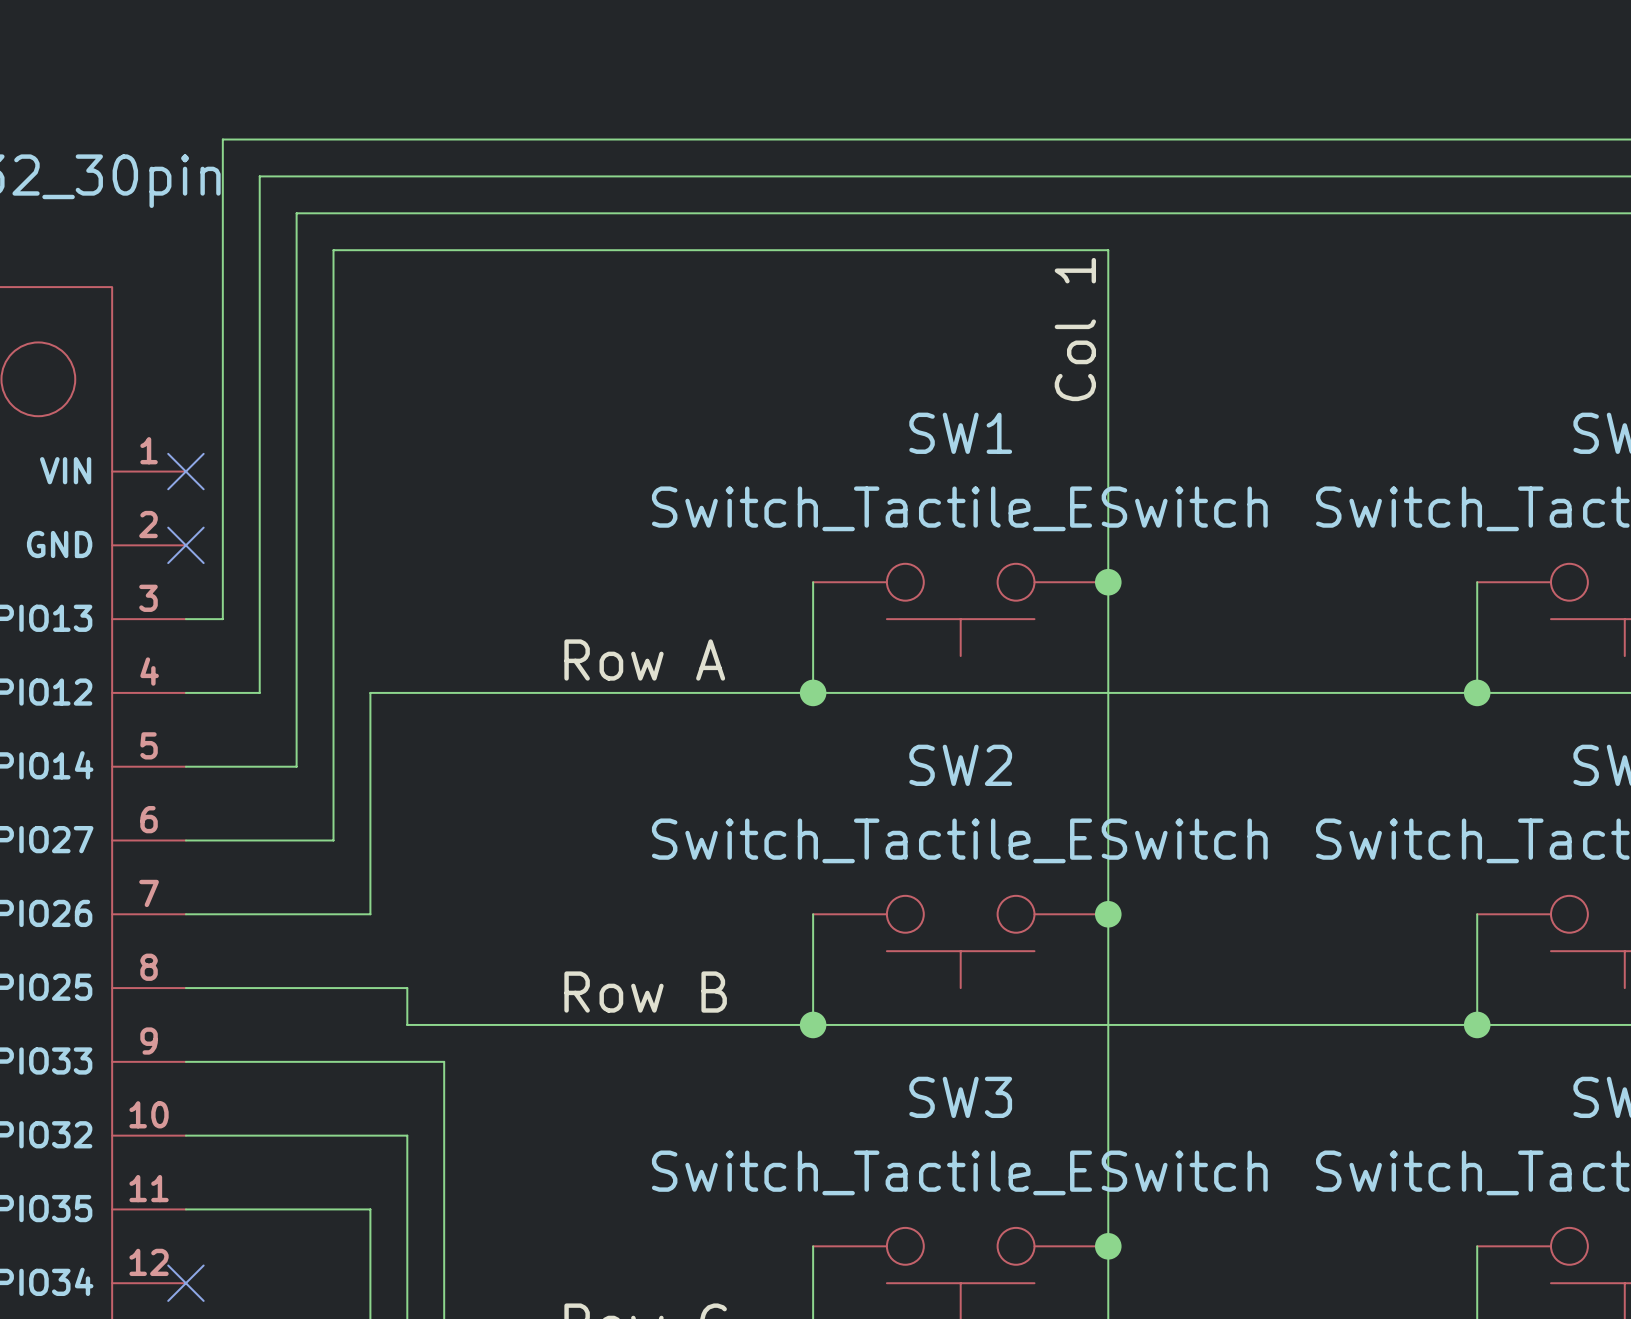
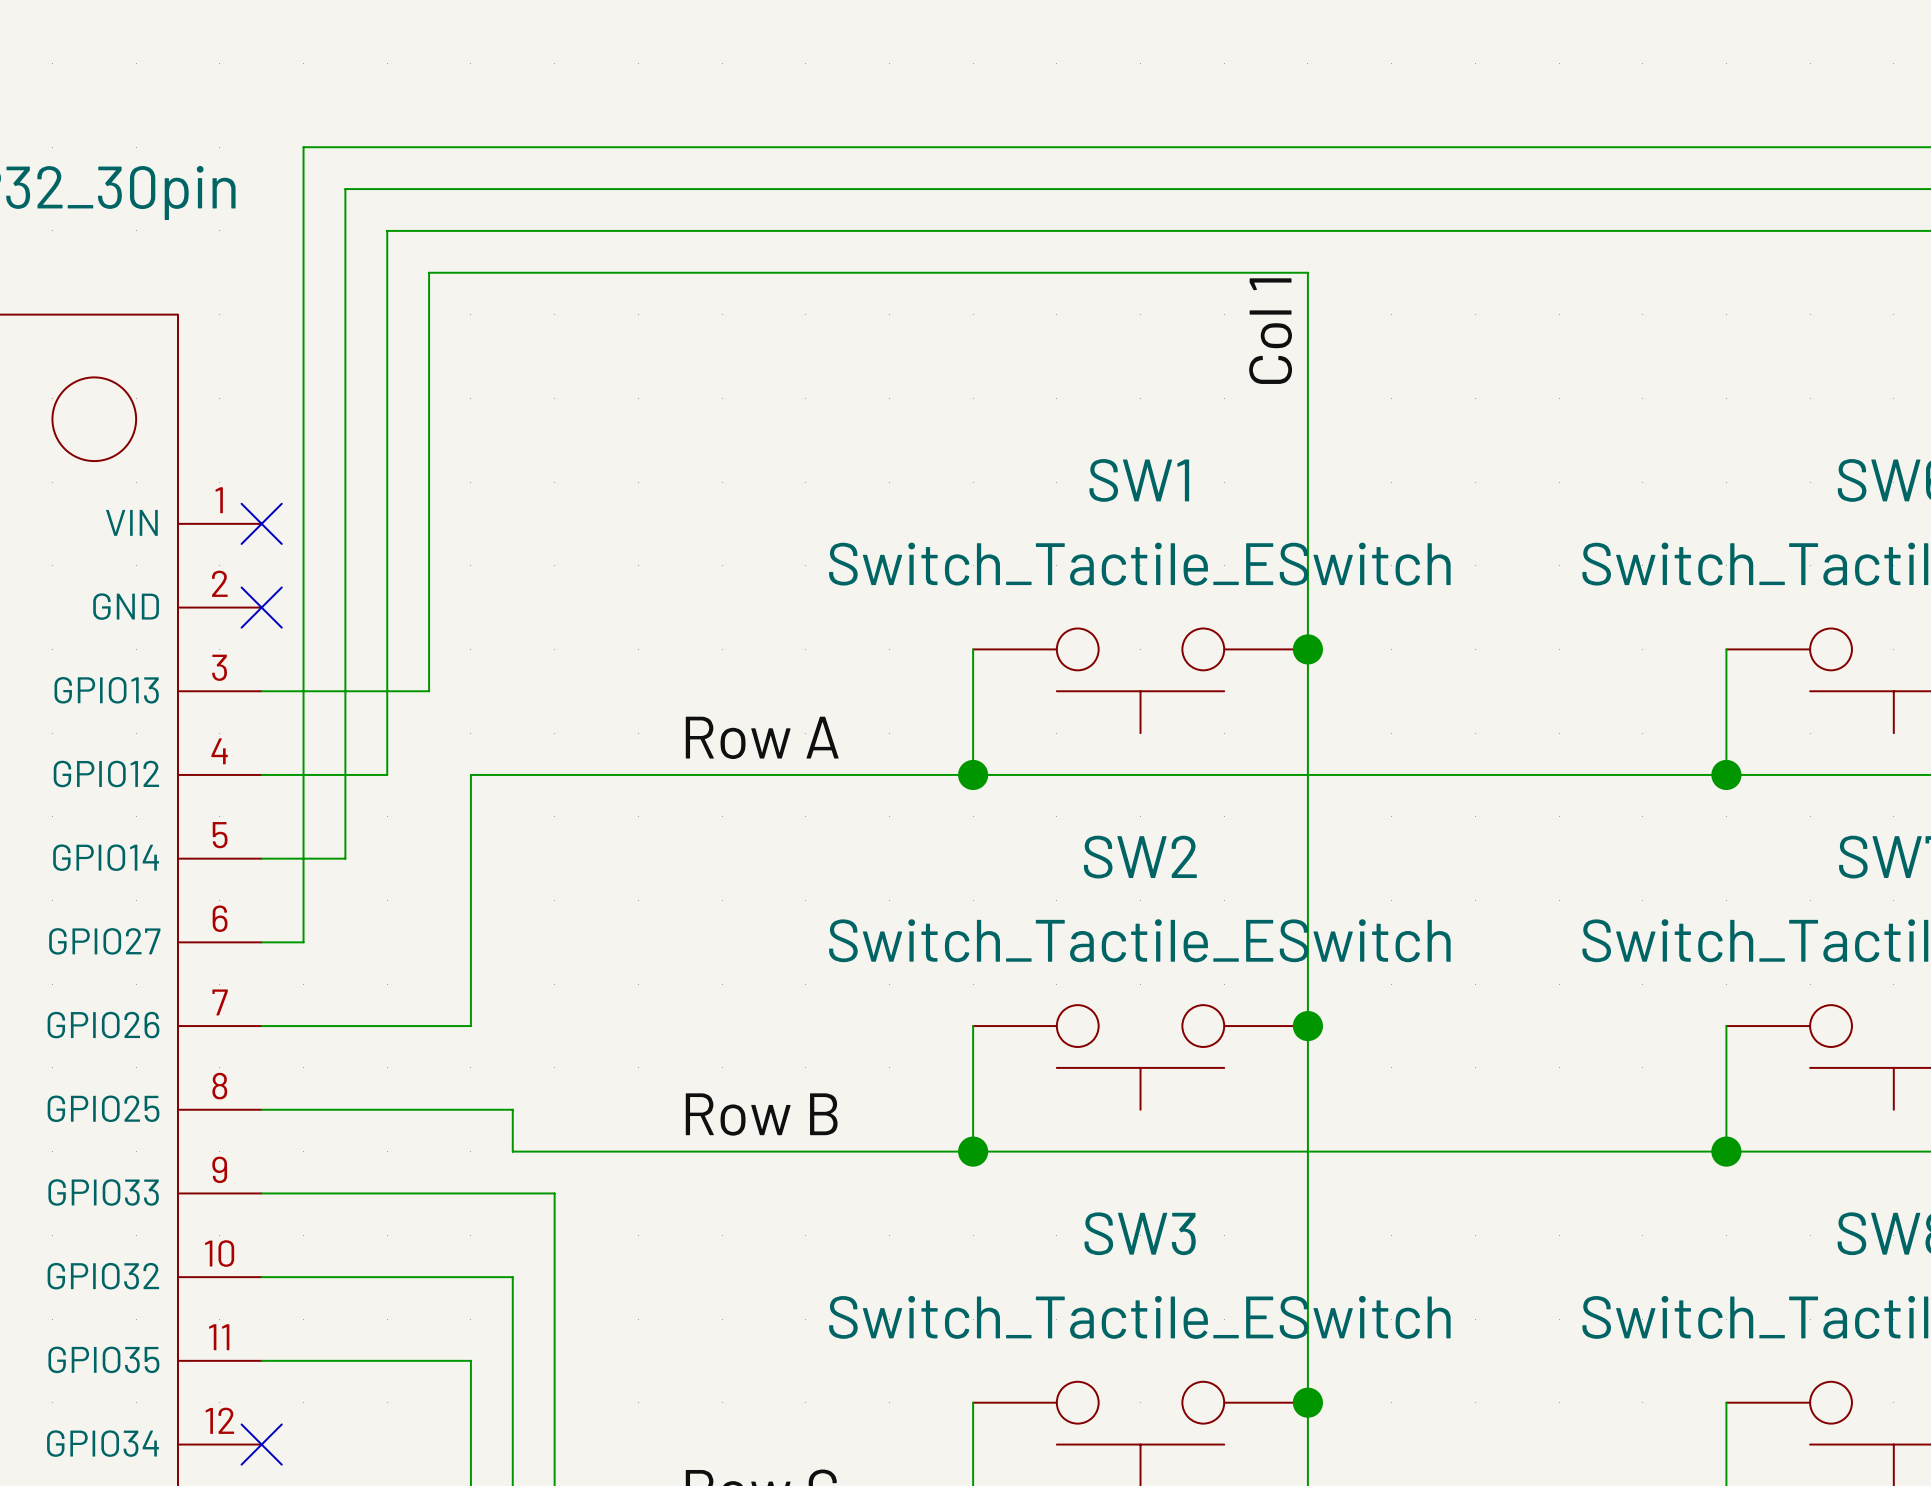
wire: (333, 619) (333, 840) (222, 840) -> (429, 691) (303, 691) (303, 942)
wire: (296, 692) (296, 766) (259, 766) -> (387, 774) (345, 774) (345, 858)

